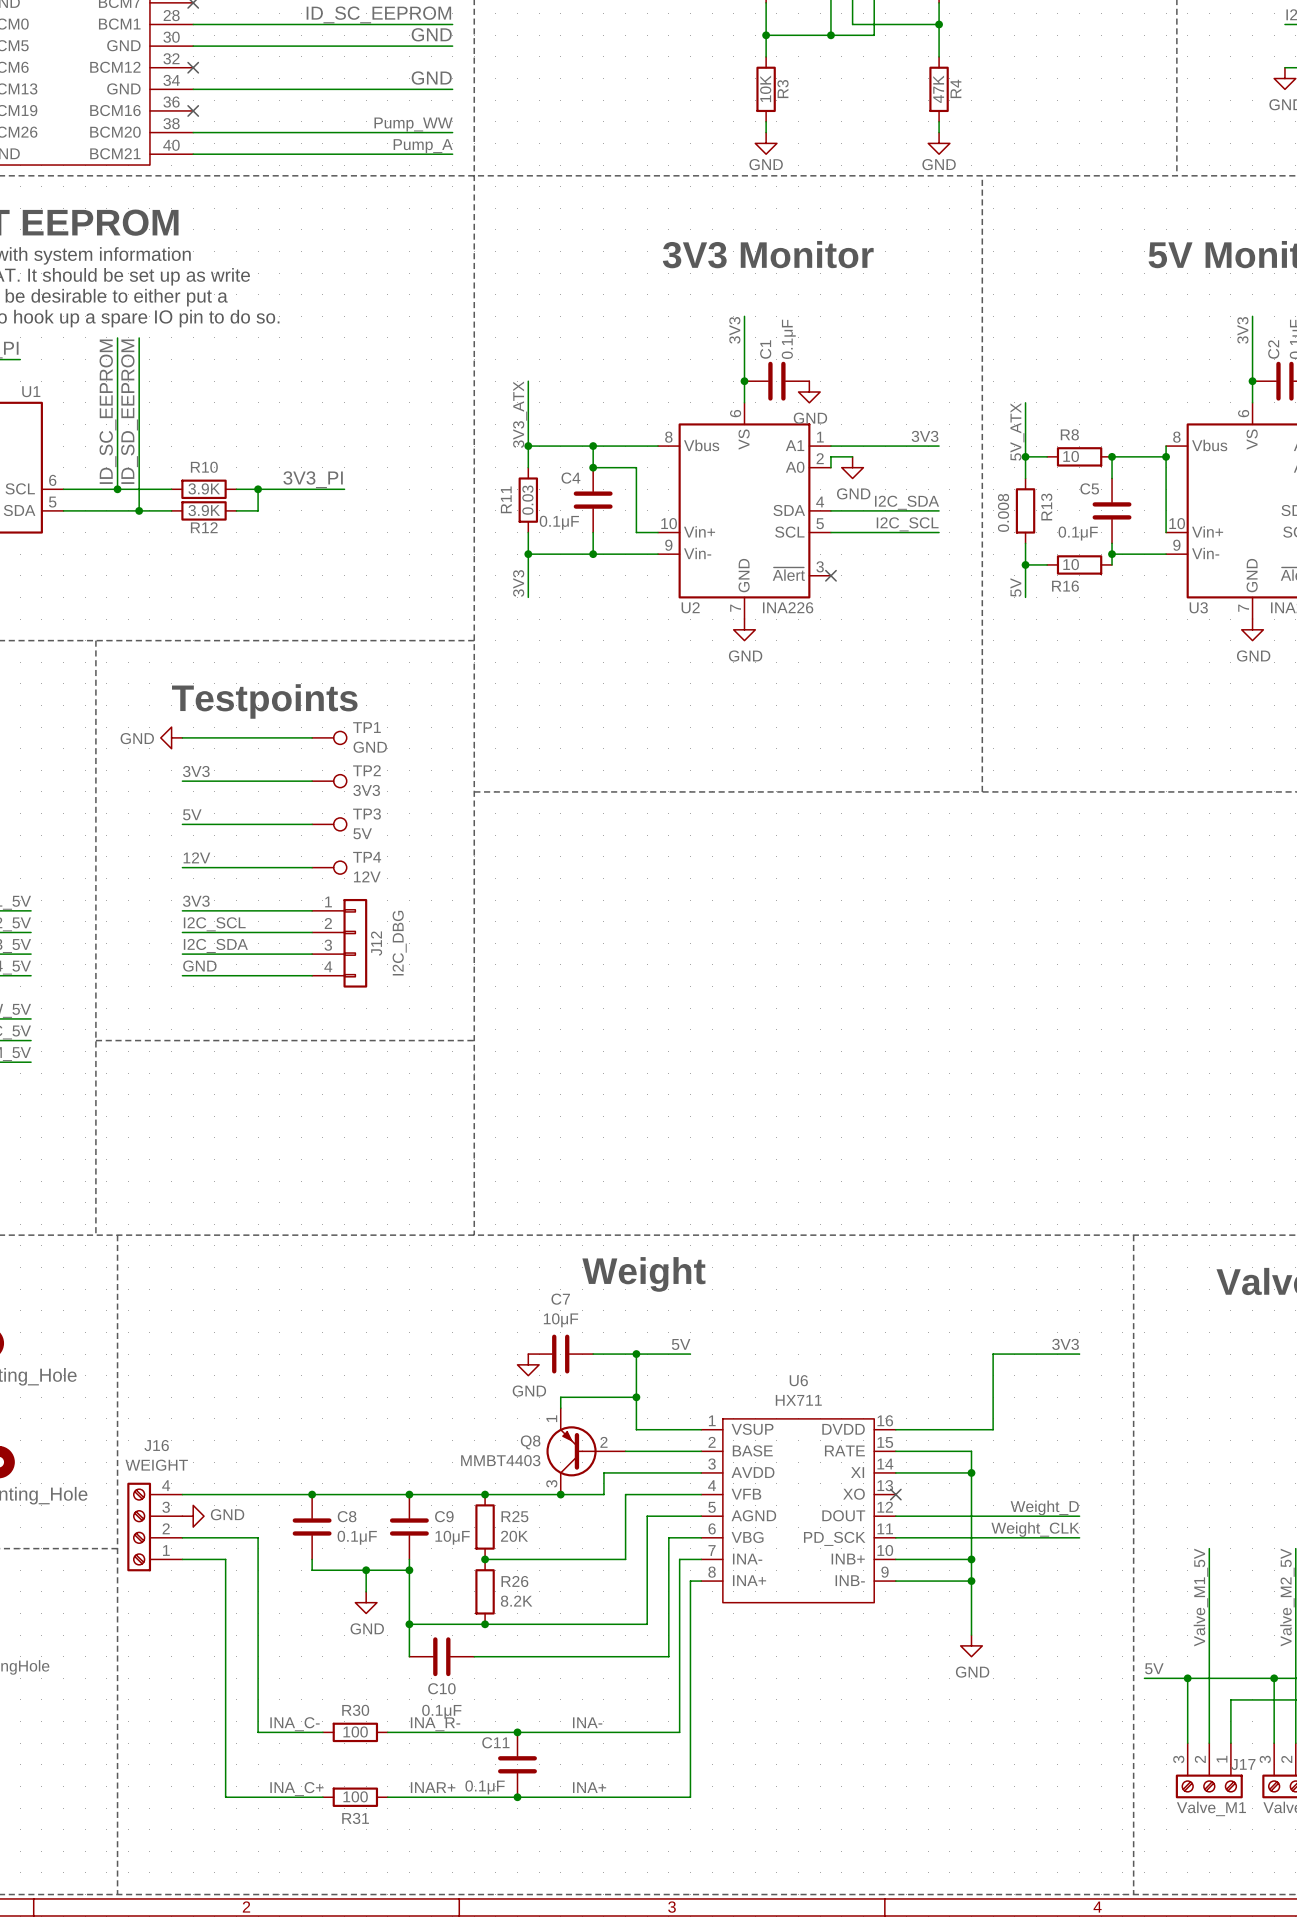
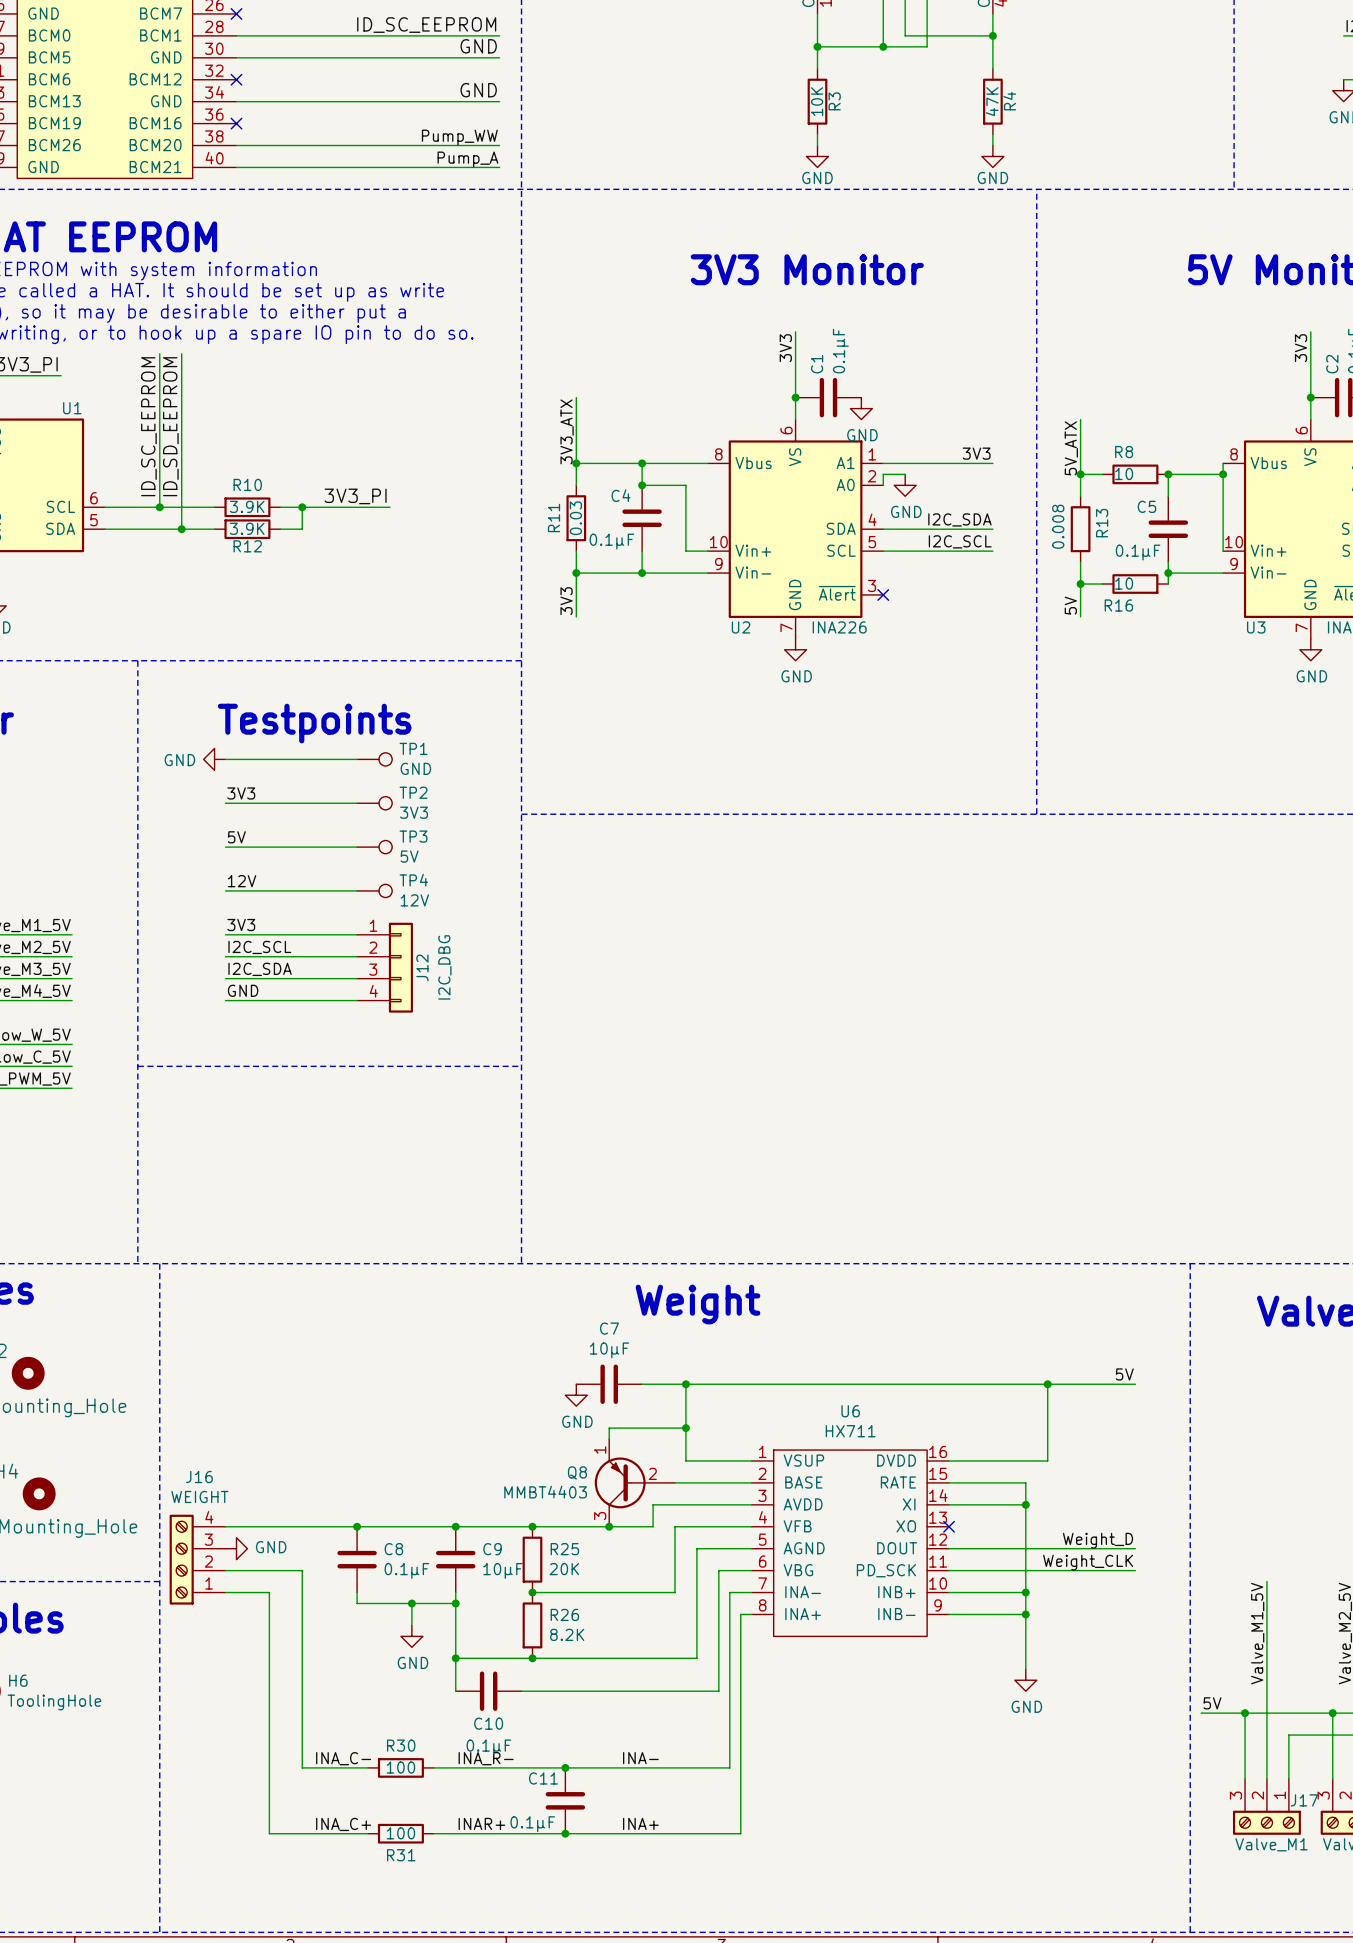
label: 5V (681, 1344) -> none
label: 3V3 (1065, 1344) -> none
label: none -> 5V (1124, 1374)
wire: none -> (740, 1384) (1047, 1384)
junction: none -> (1047, 1384)

